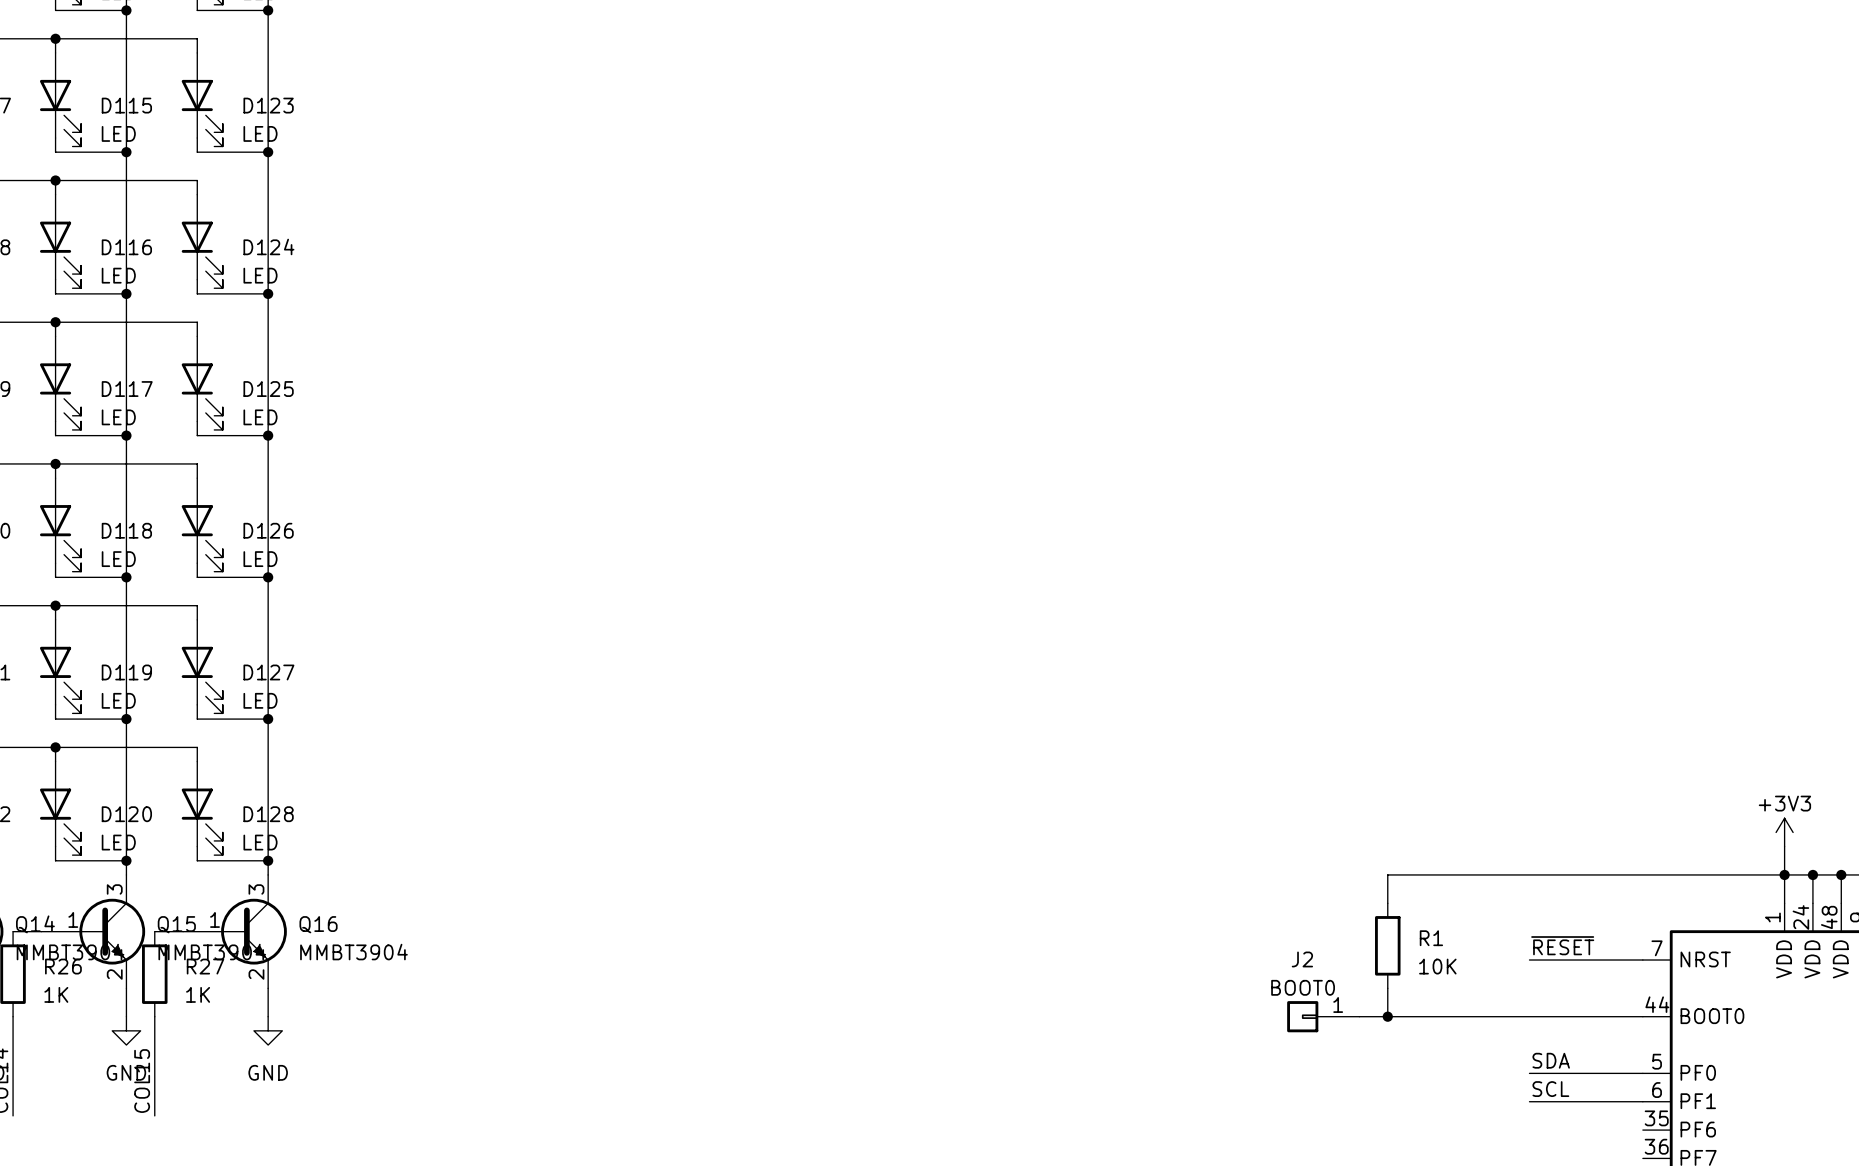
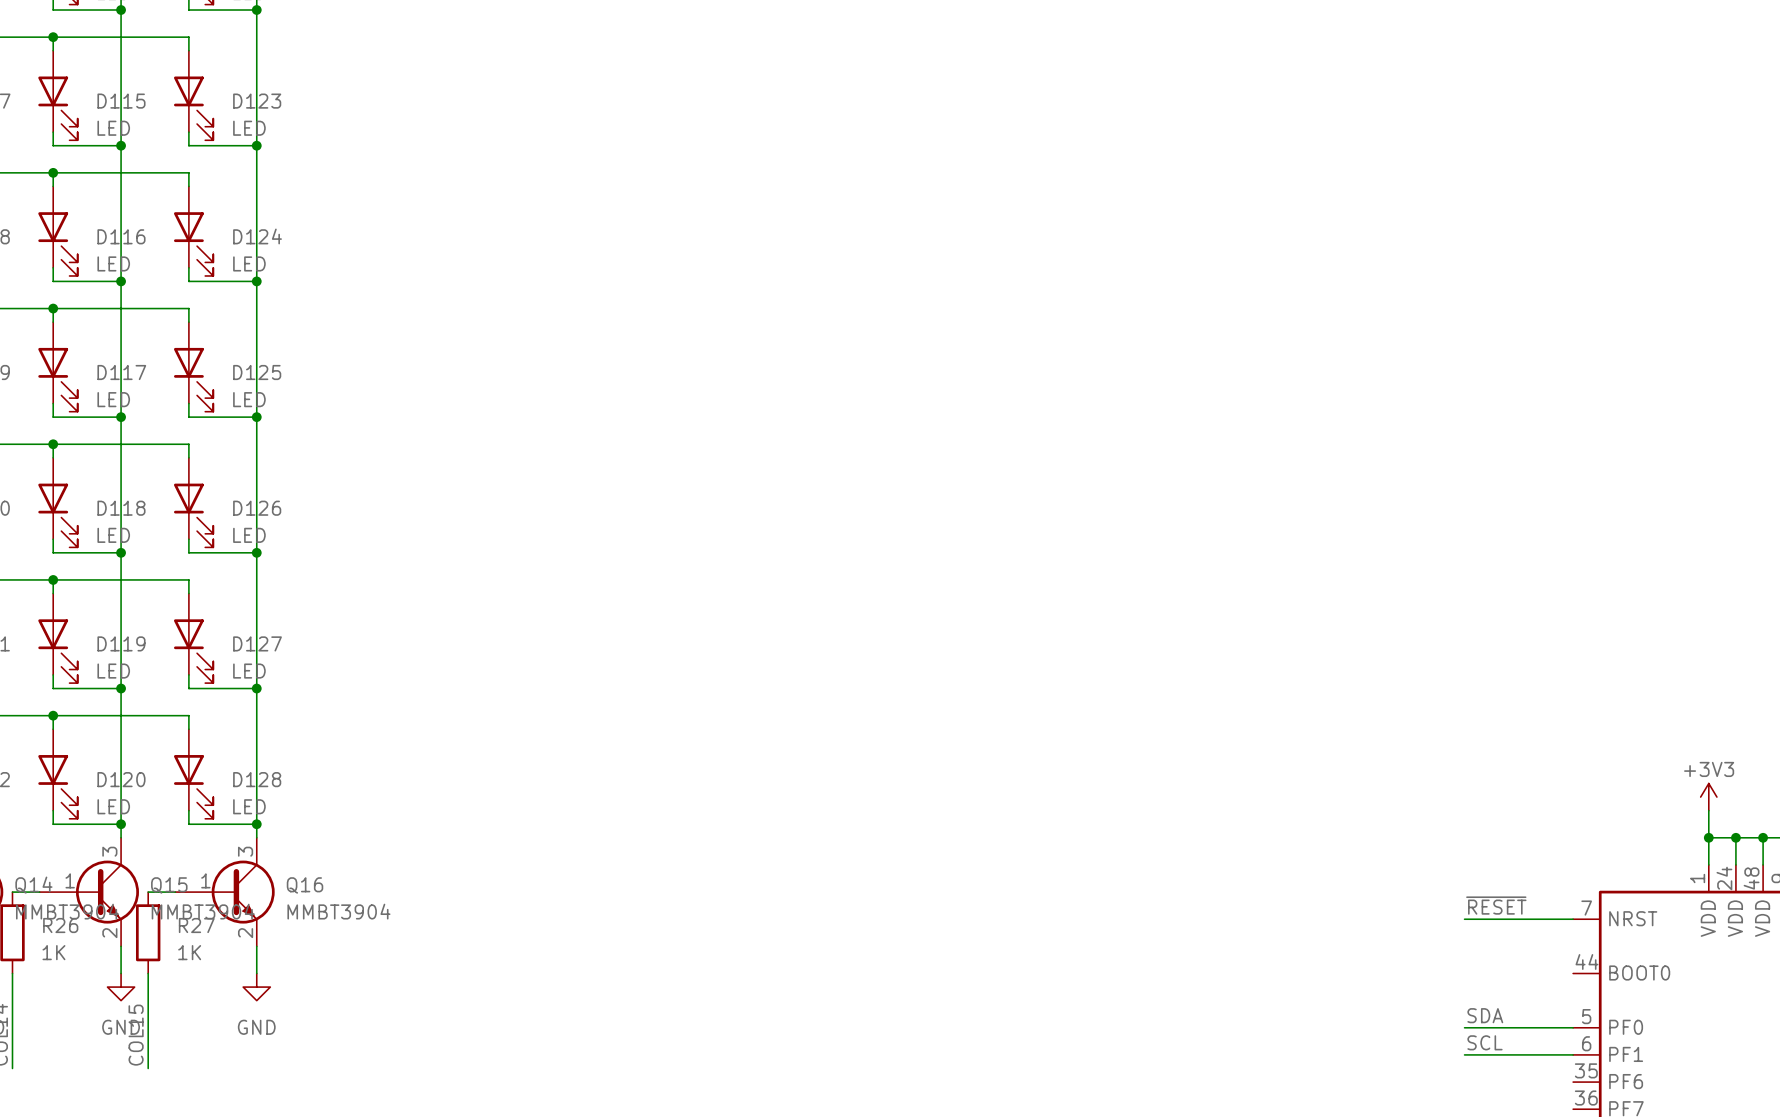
wire: (1784, 874) (1387, 874) (1387, 903) -> none
R1: 10K (1387, 945) -> none
wire: (1387, 988) (1387, 1016) -> none
J2: BOOT0 (1323, 1016) -> none
wire: (1359, 1016) (1642, 1016) -> none
junction: (1387, 1016) -> none

